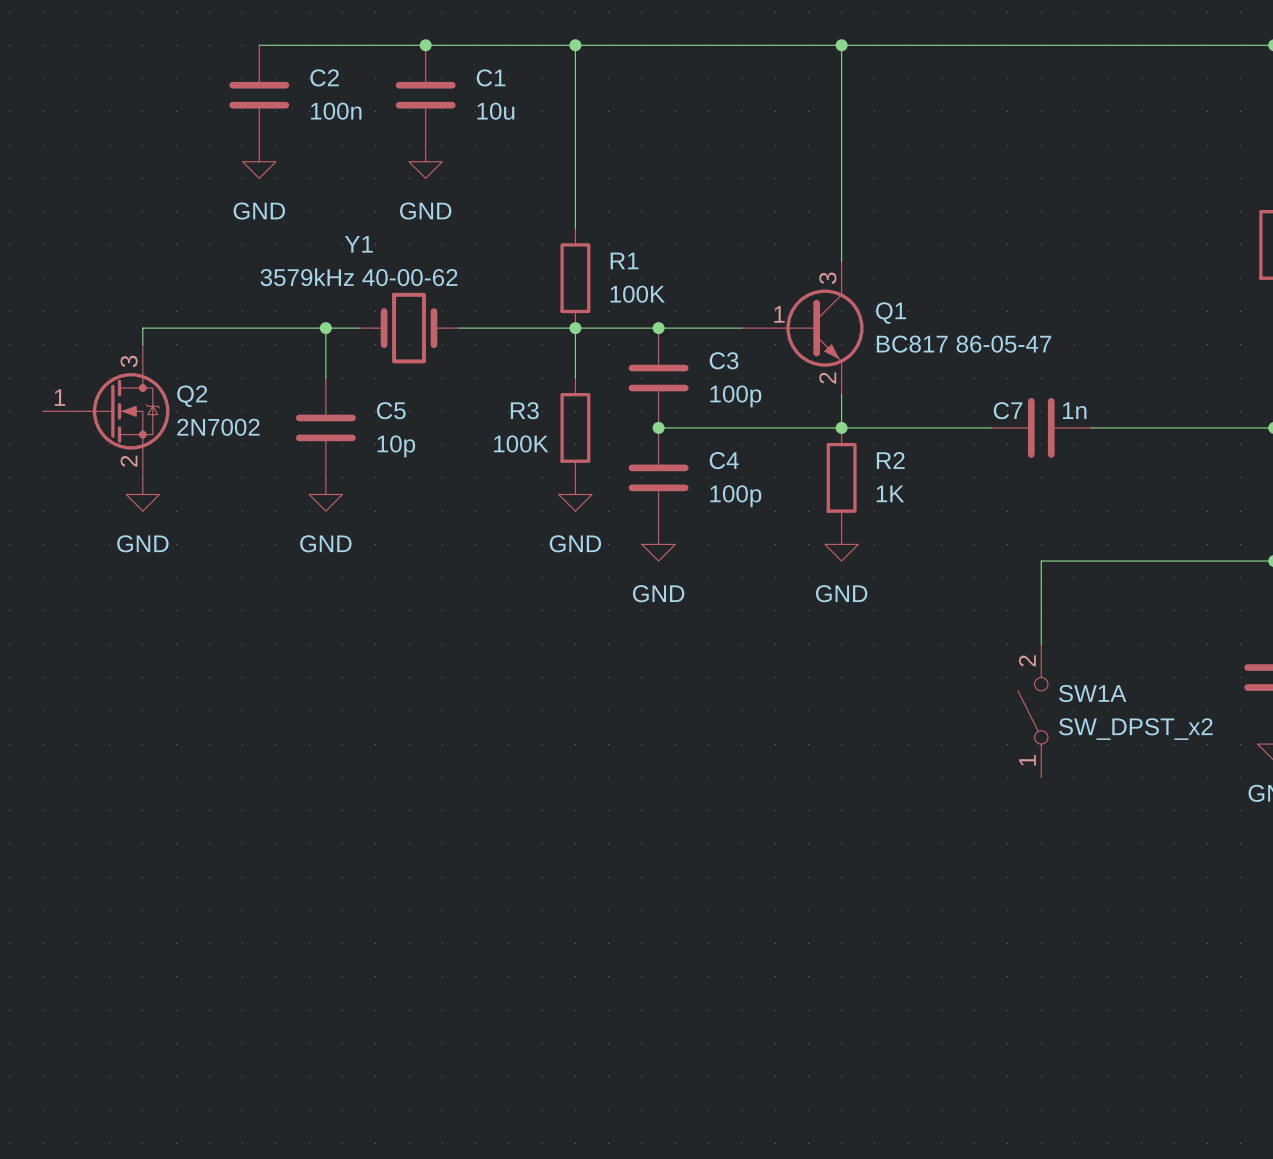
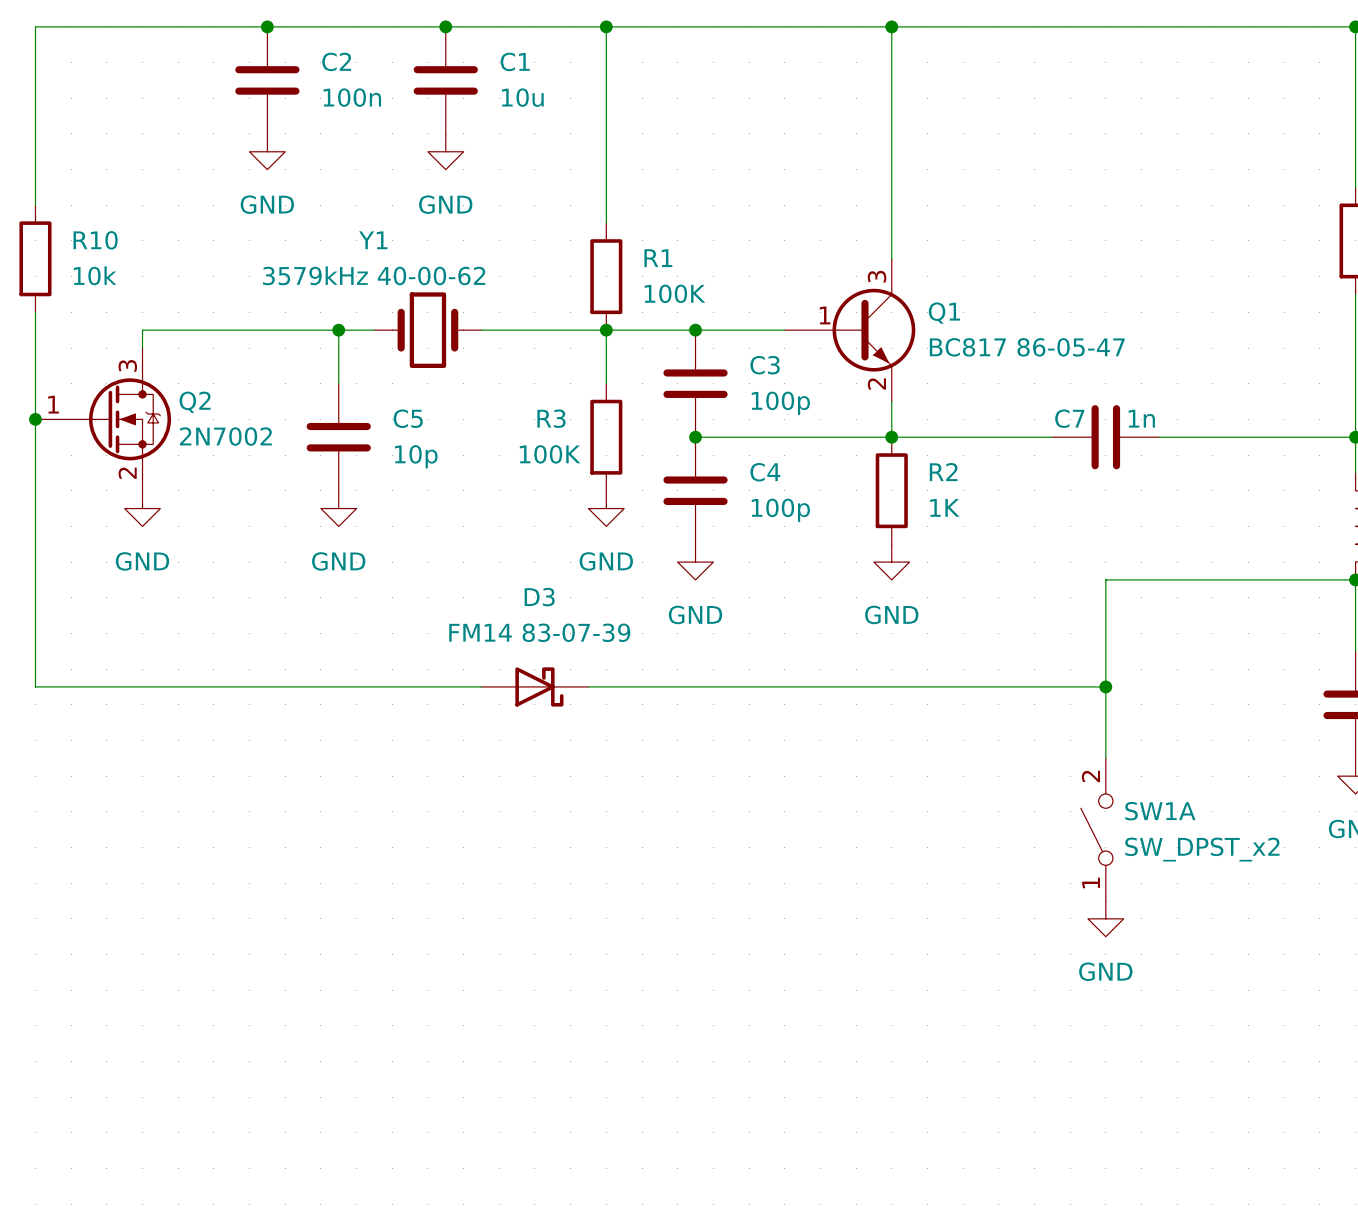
wire: none -> (267, 26) (35, 26) (35, 205)
junction: none -> (267, 26)
R10: none -> 10k (35, 258)
wire: none -> (35, 312) (35, 686) (481, 686)
junction: none -> (35, 419)
wire: none -> (1105, 669) (1105, 758)
D3: none -> FM14 83-07-39 (534, 686)
wire: none -> (588, 686) (1105, 686)
junction: none -> (1105, 686)
SW1A position: (1032, 710) -> (1096, 829)
power symbol: none -> GND (1105, 918)

